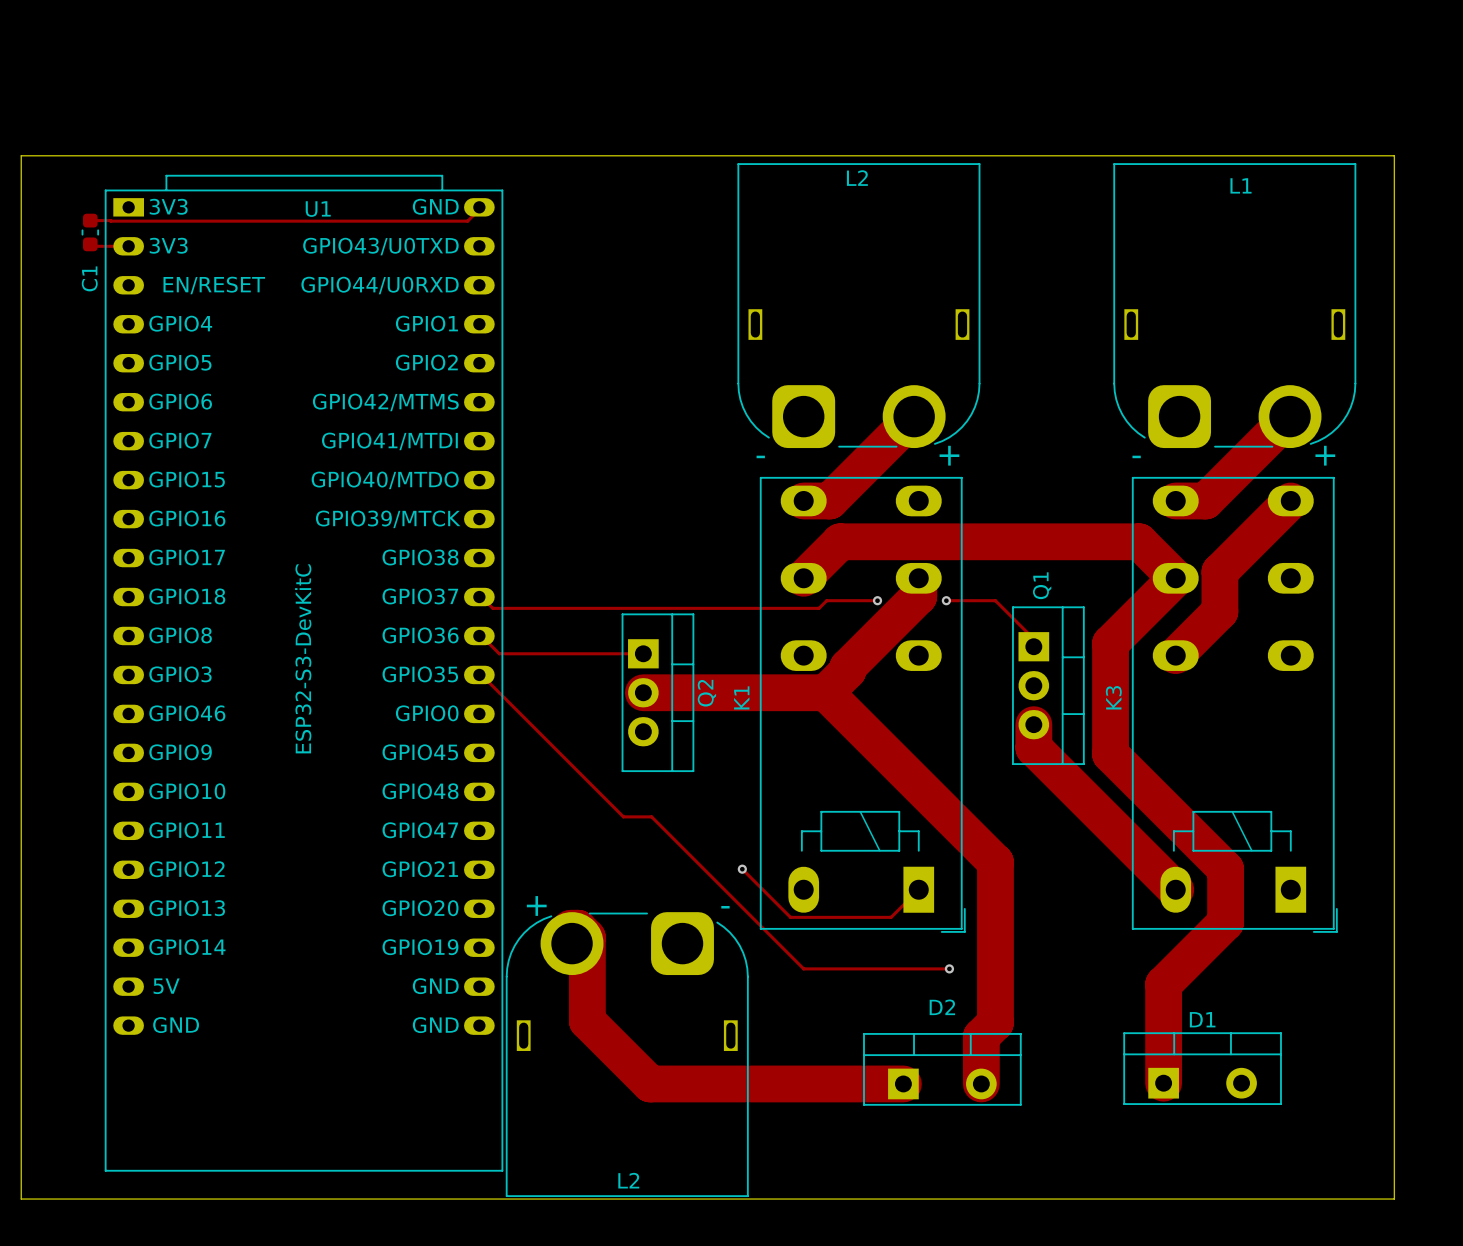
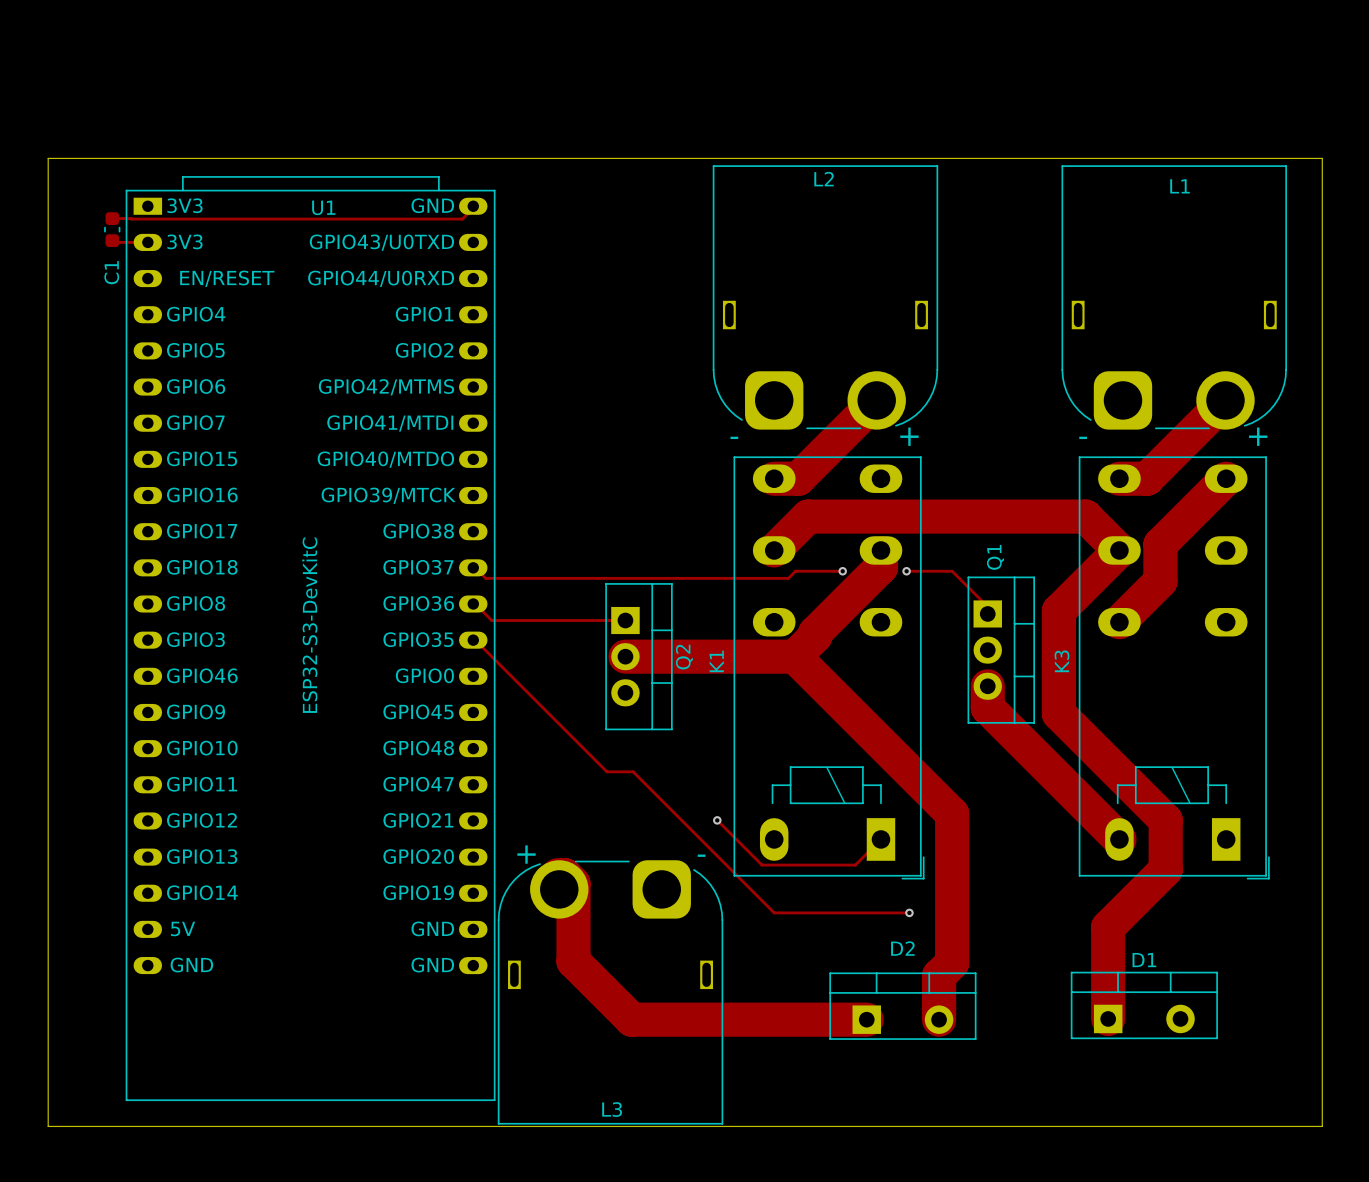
L2 name: L2 (628, 1180) -> L3 (612, 1109)

